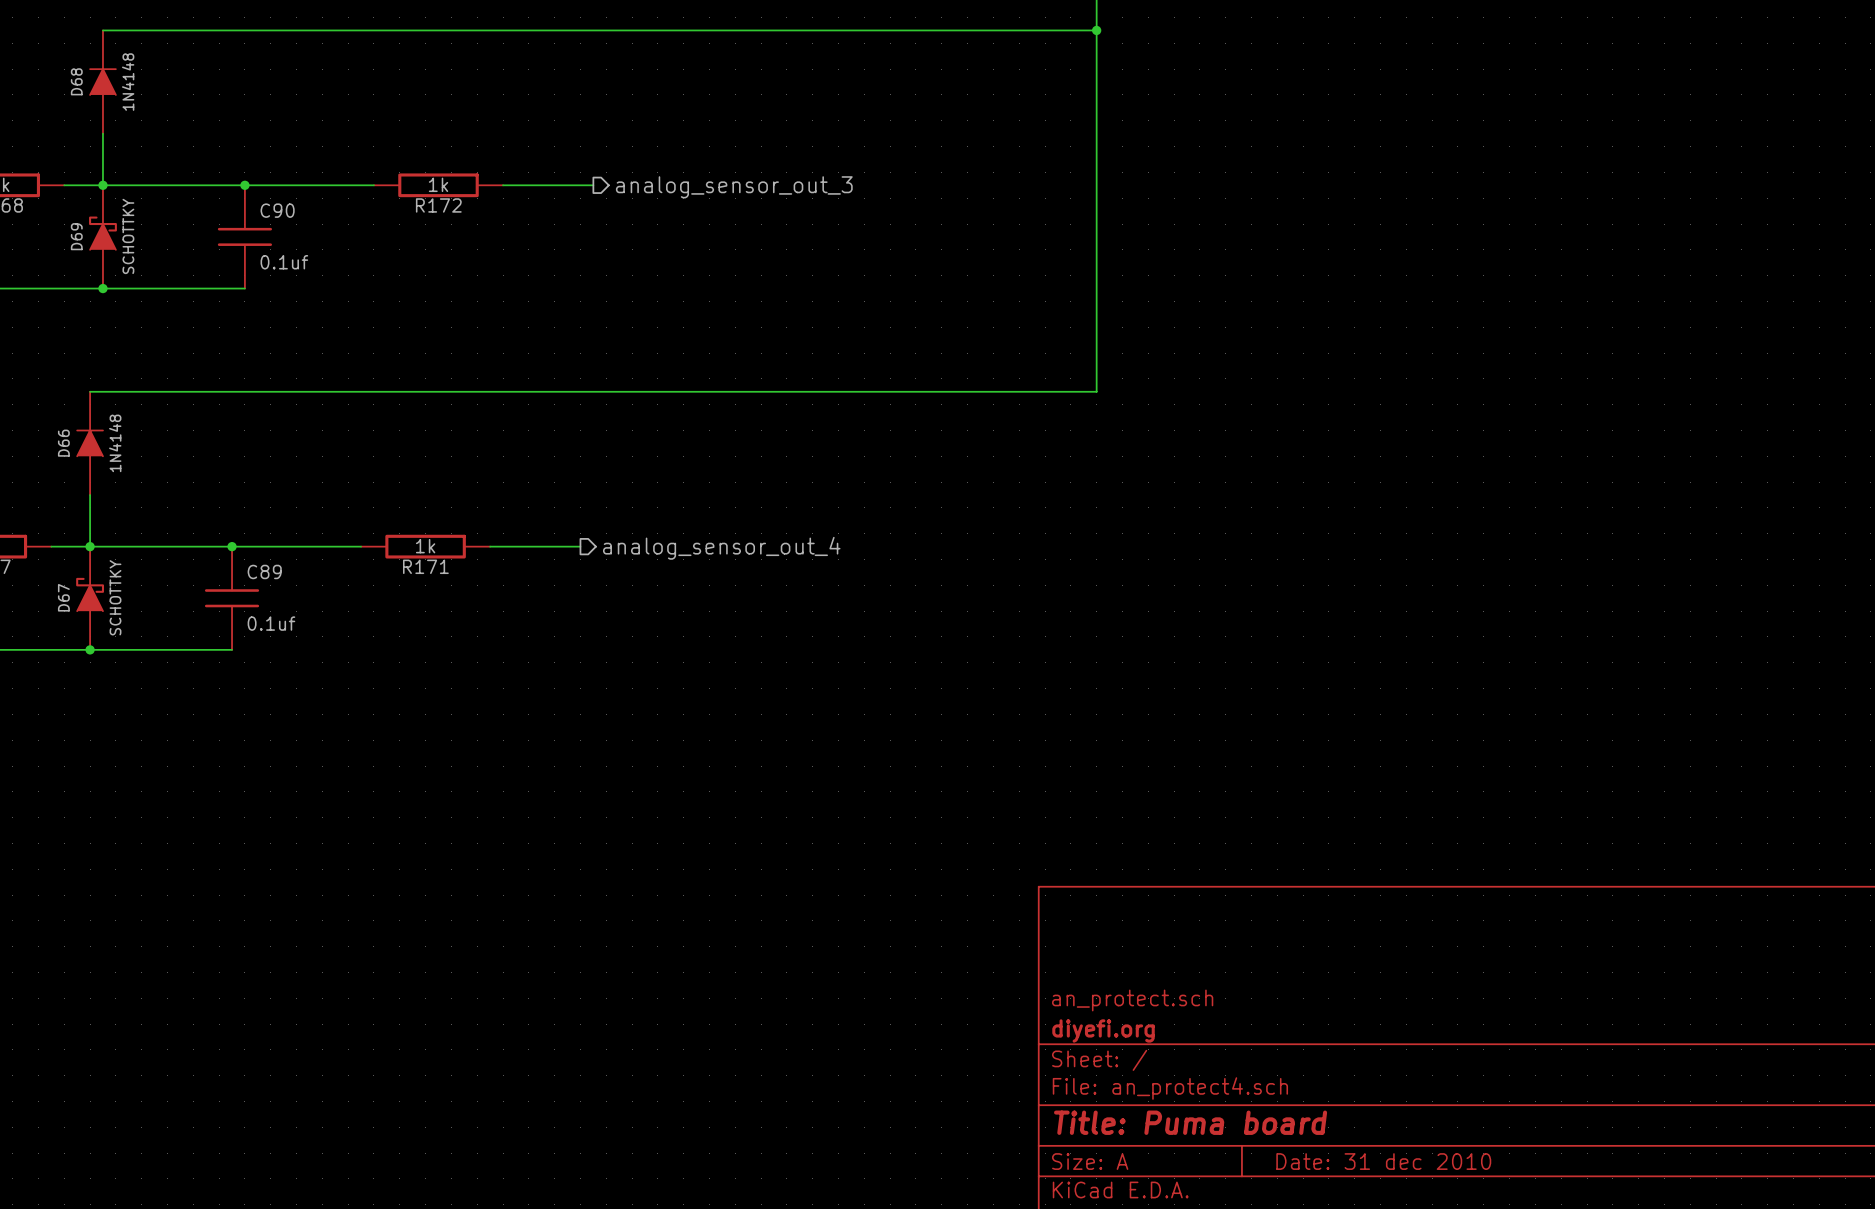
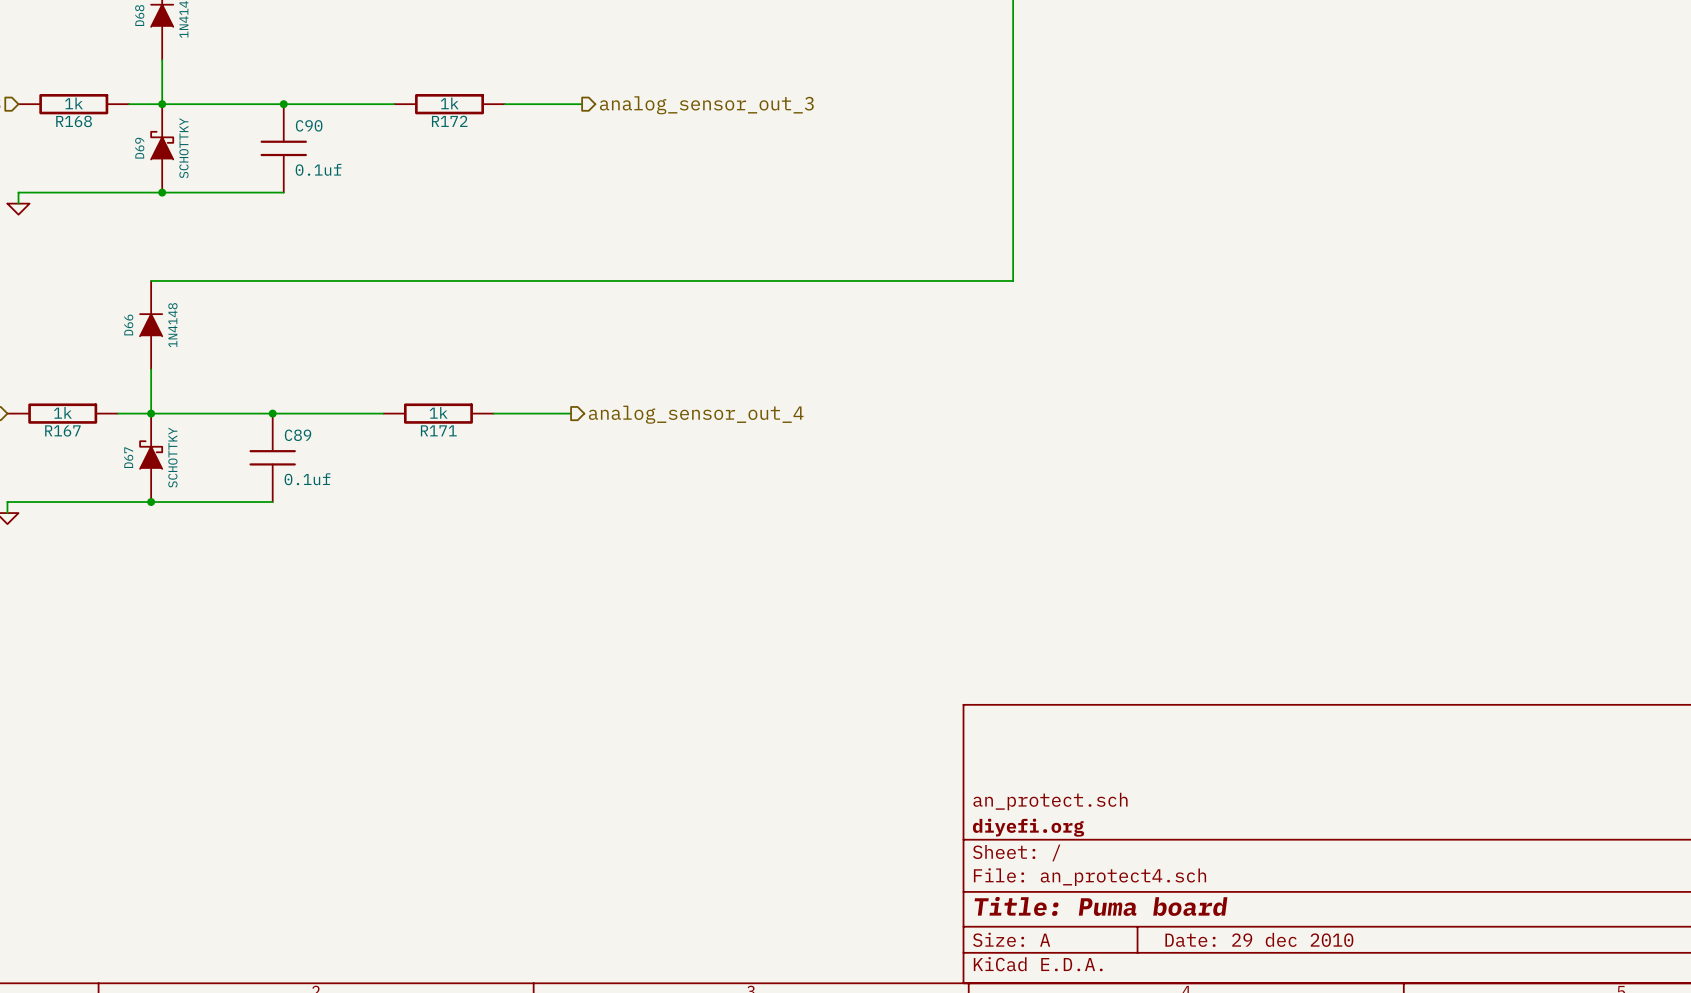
title block: Date: 31 dec 2010 (1383, 1161) -> Date: 29 dec 2010 (1259, 939)

